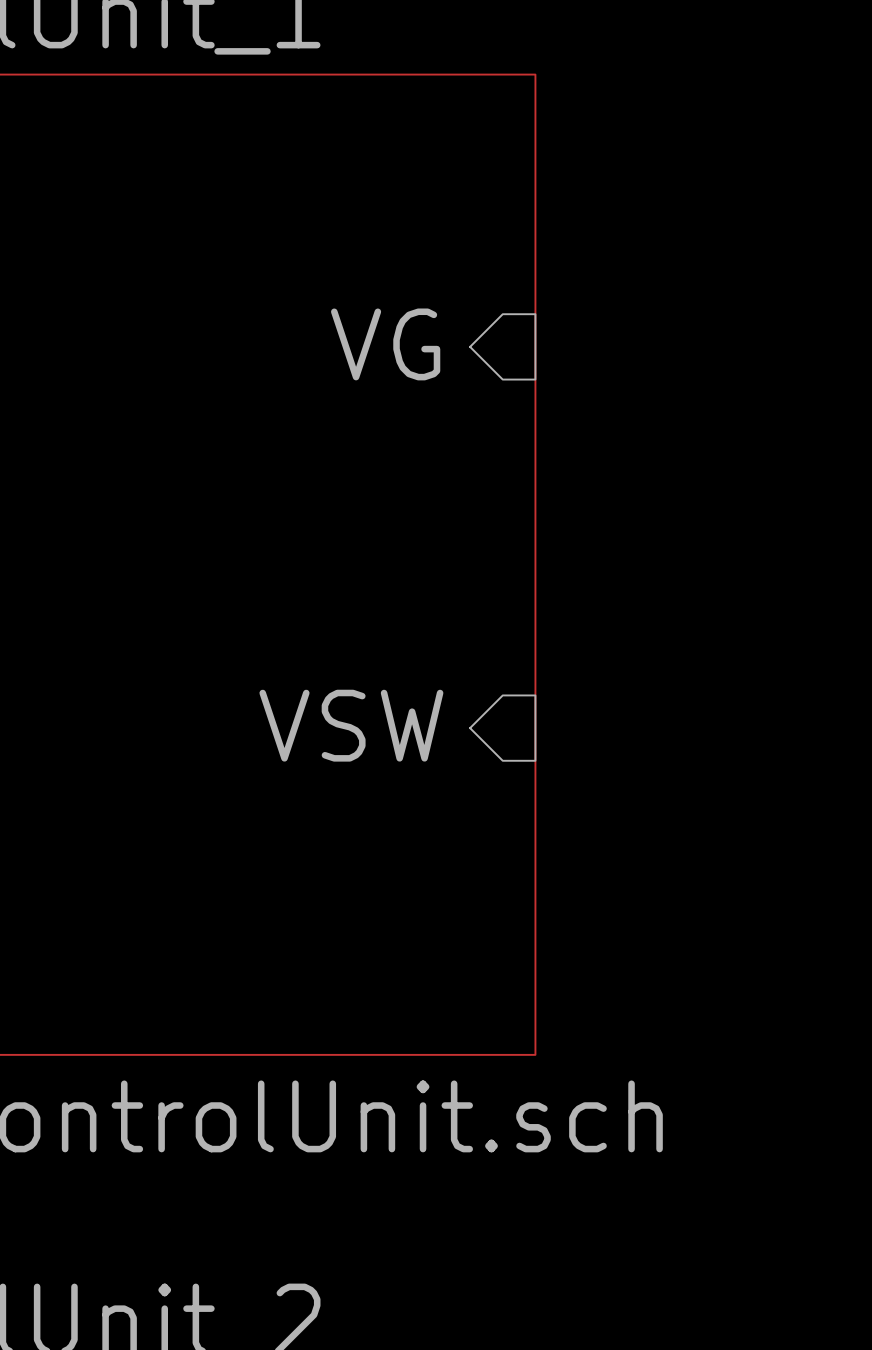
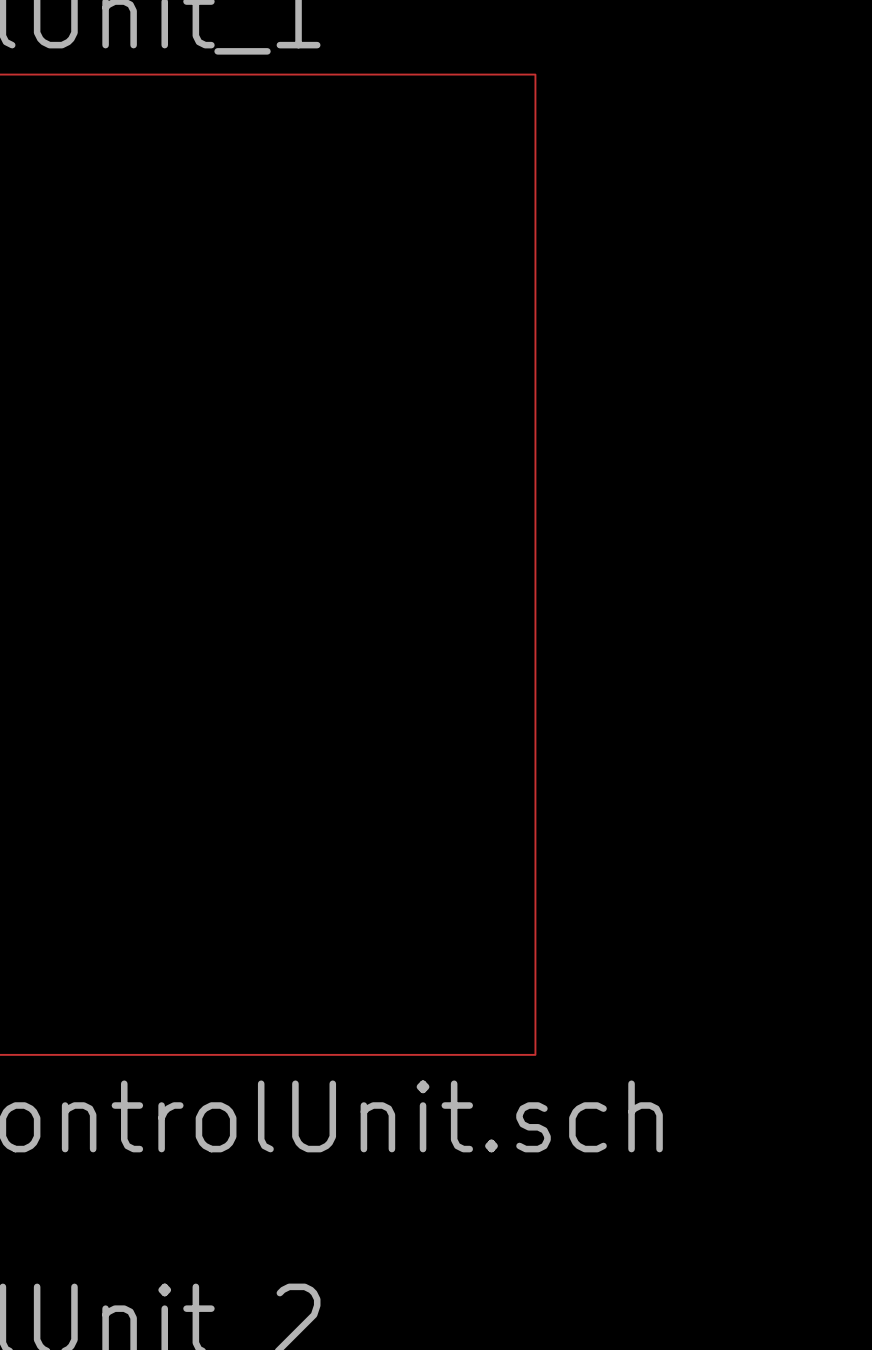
sheet pin: VG (385, 344) -> none
sheet pin: VSW (351, 725) -> none

